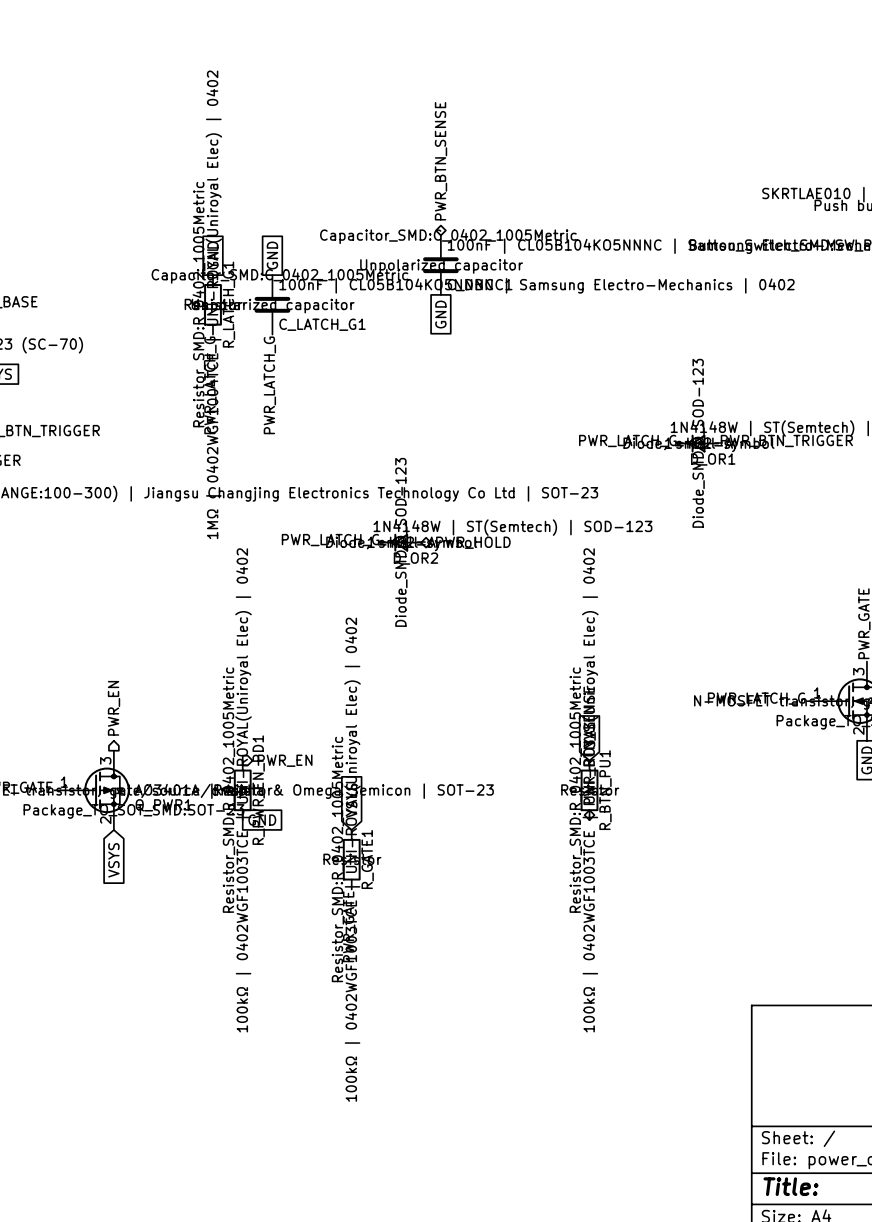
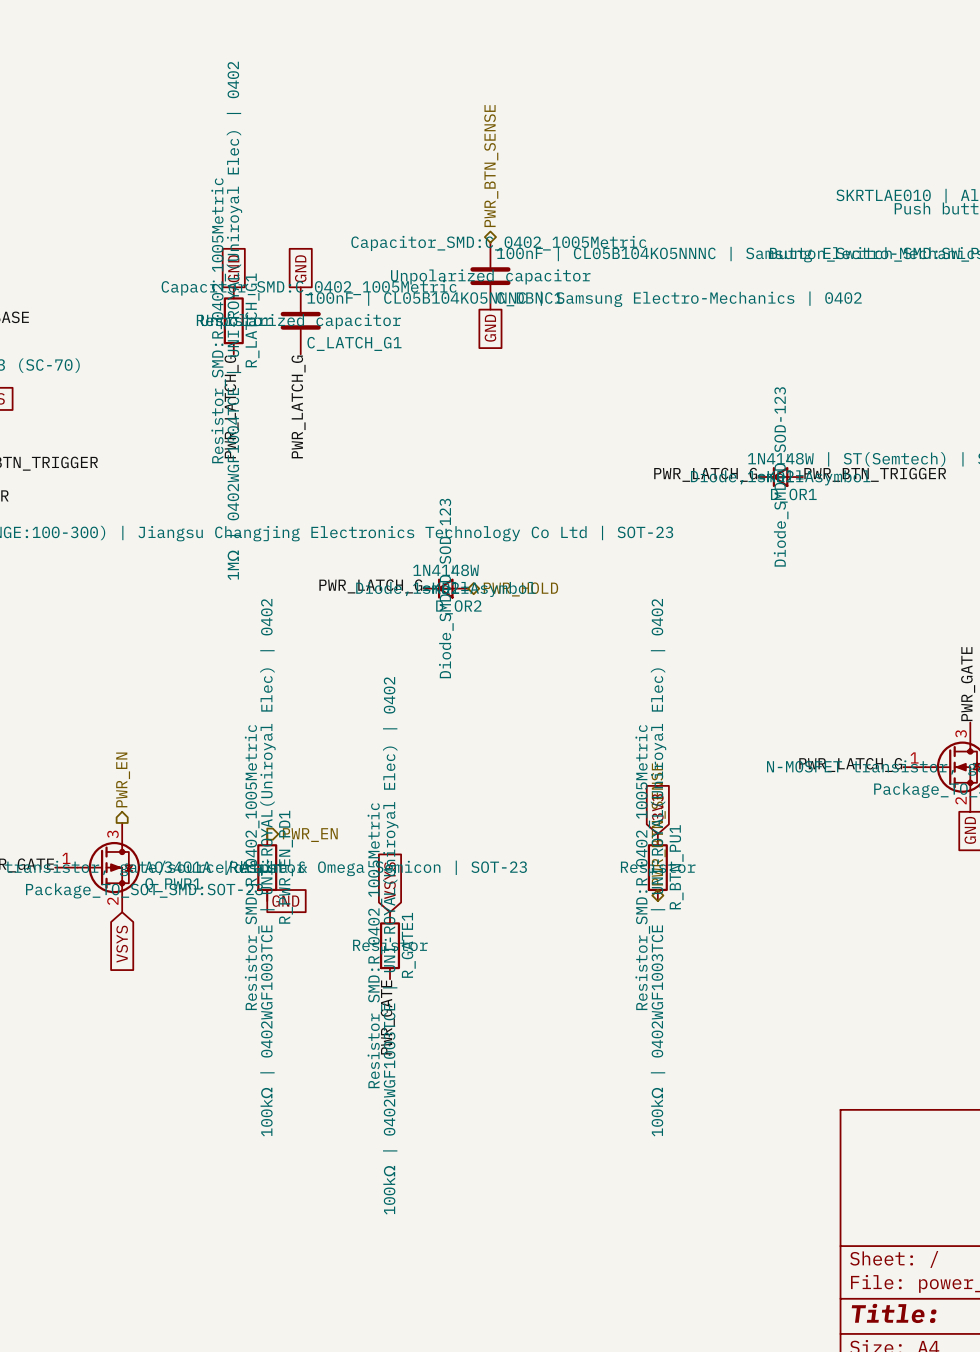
D_OR2 value: 1N4148W | ST(Semtech) | SOD-123 (512, 527) -> 1N4148W (446, 570)

